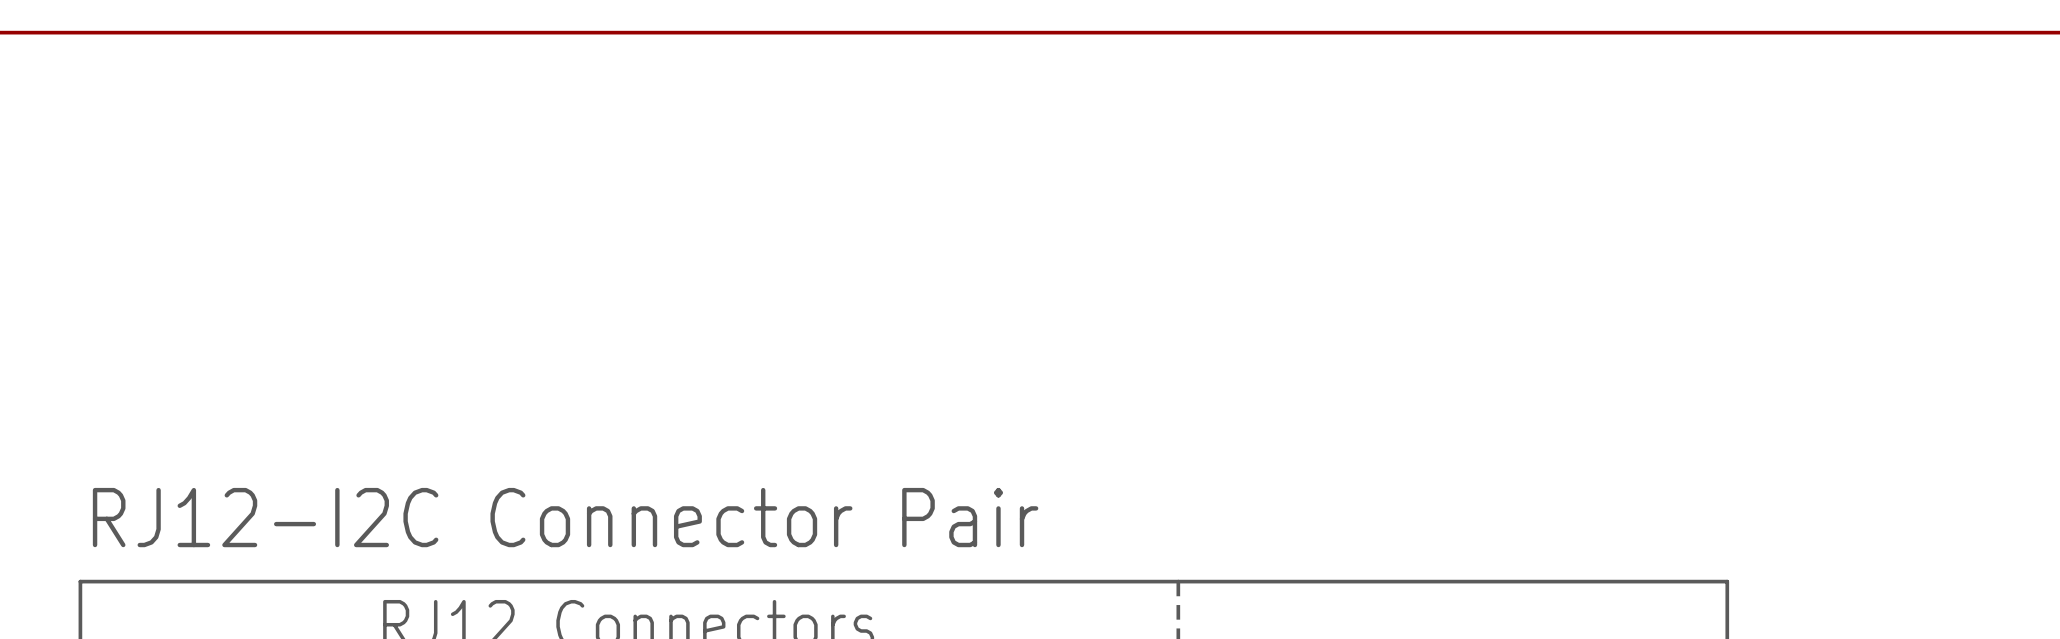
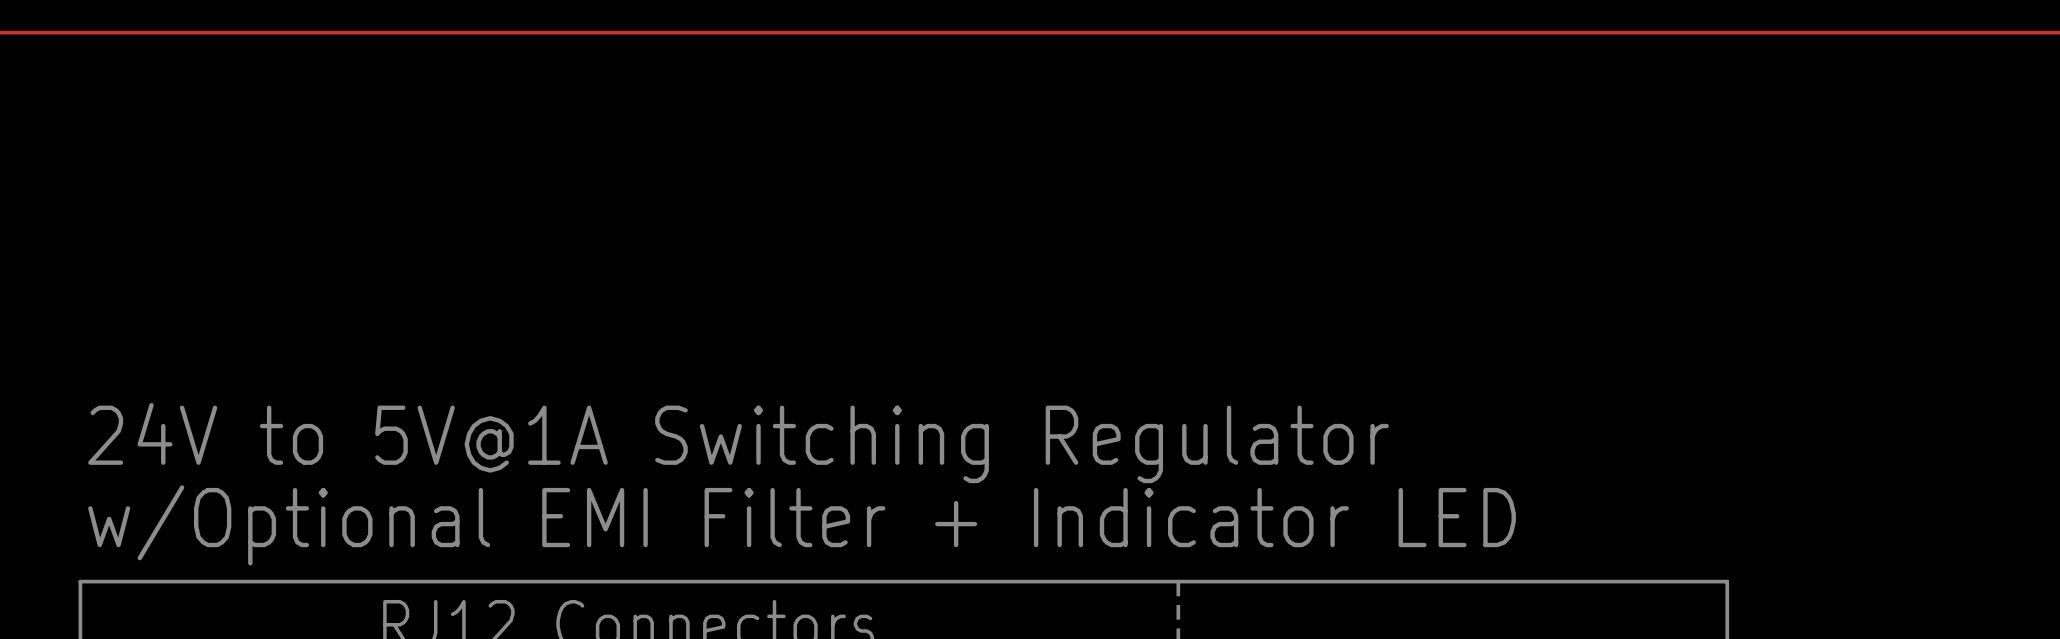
text: none -> 24V to 5V@1A Switching Regulator (738, 443)
text: RJ12-I2C Connector Pair (565, 517) -> w/Optional EMI Filter + Indicator LED (802, 525)

